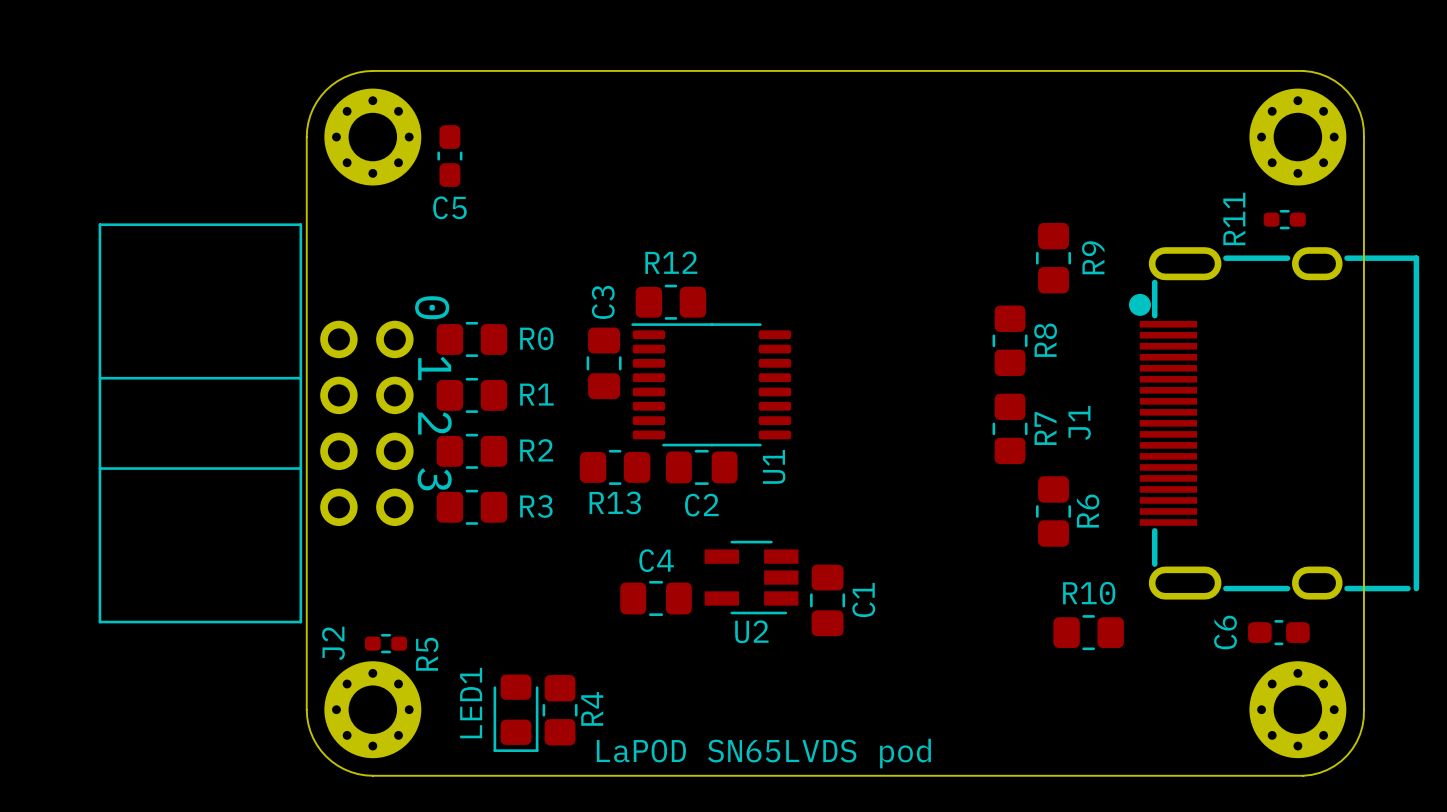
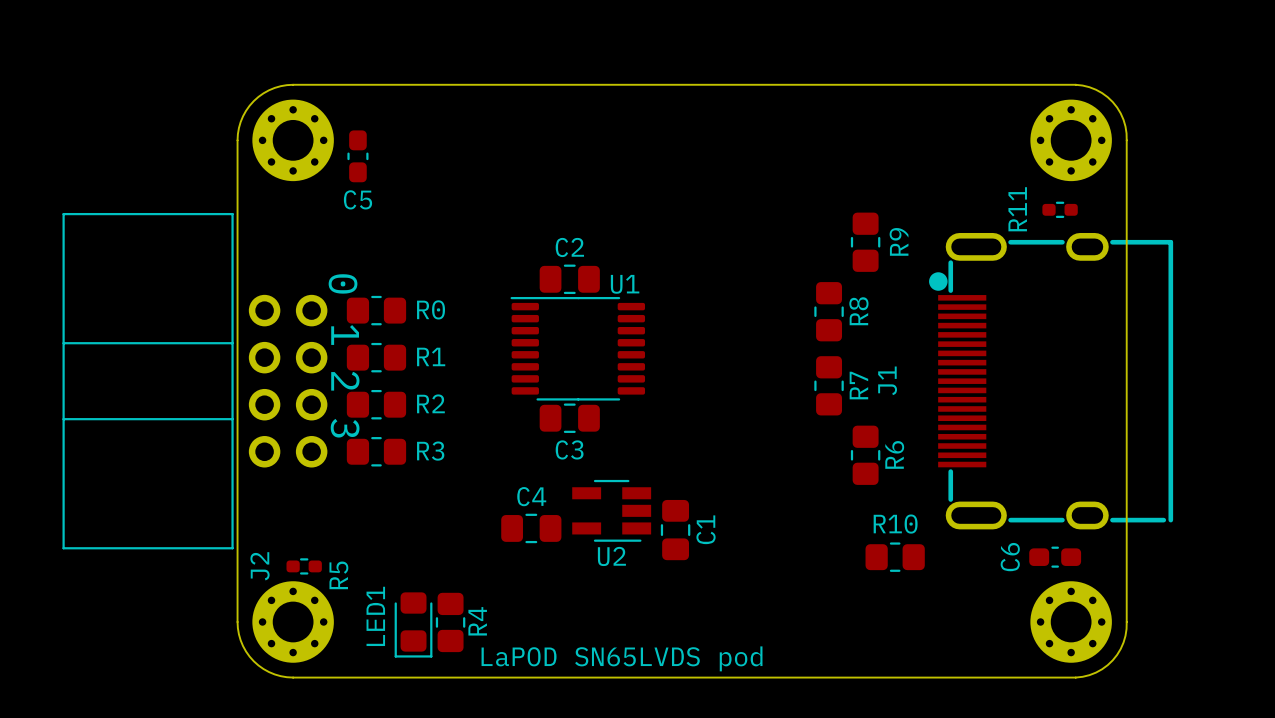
R12: (670, 302) -> none
C2: none -> (569, 279)
C3: (604, 363) -> none
U1 name rotation: 0° (774, 466) -> 90° clockwise (625, 284)
U1 name position: U1 (774, 466) -> U1 (625, 284)
R13: (615, 467) -> none
C2 name: C2 (701, 505) -> C3 (569, 449)

